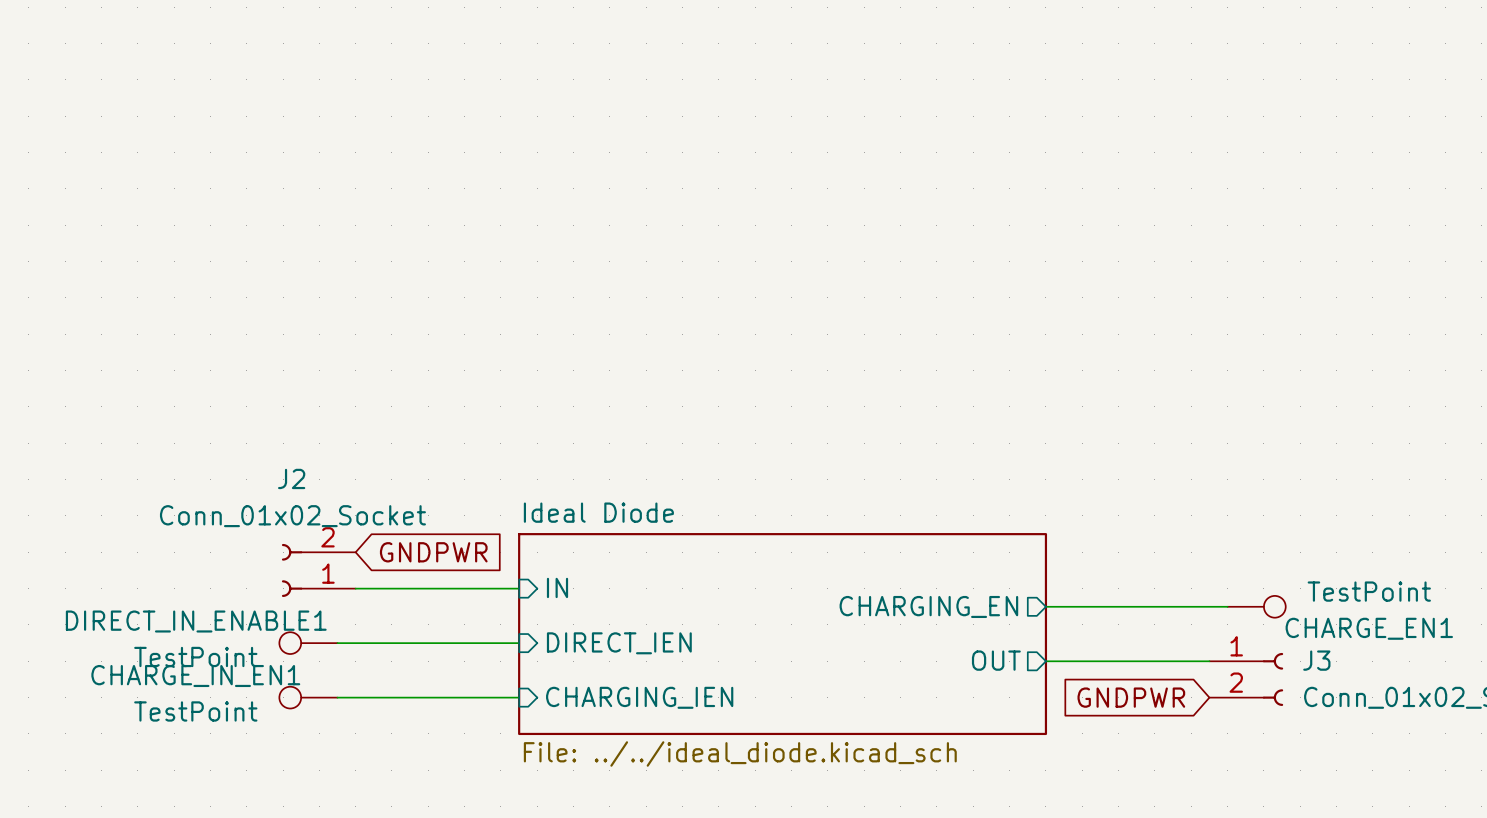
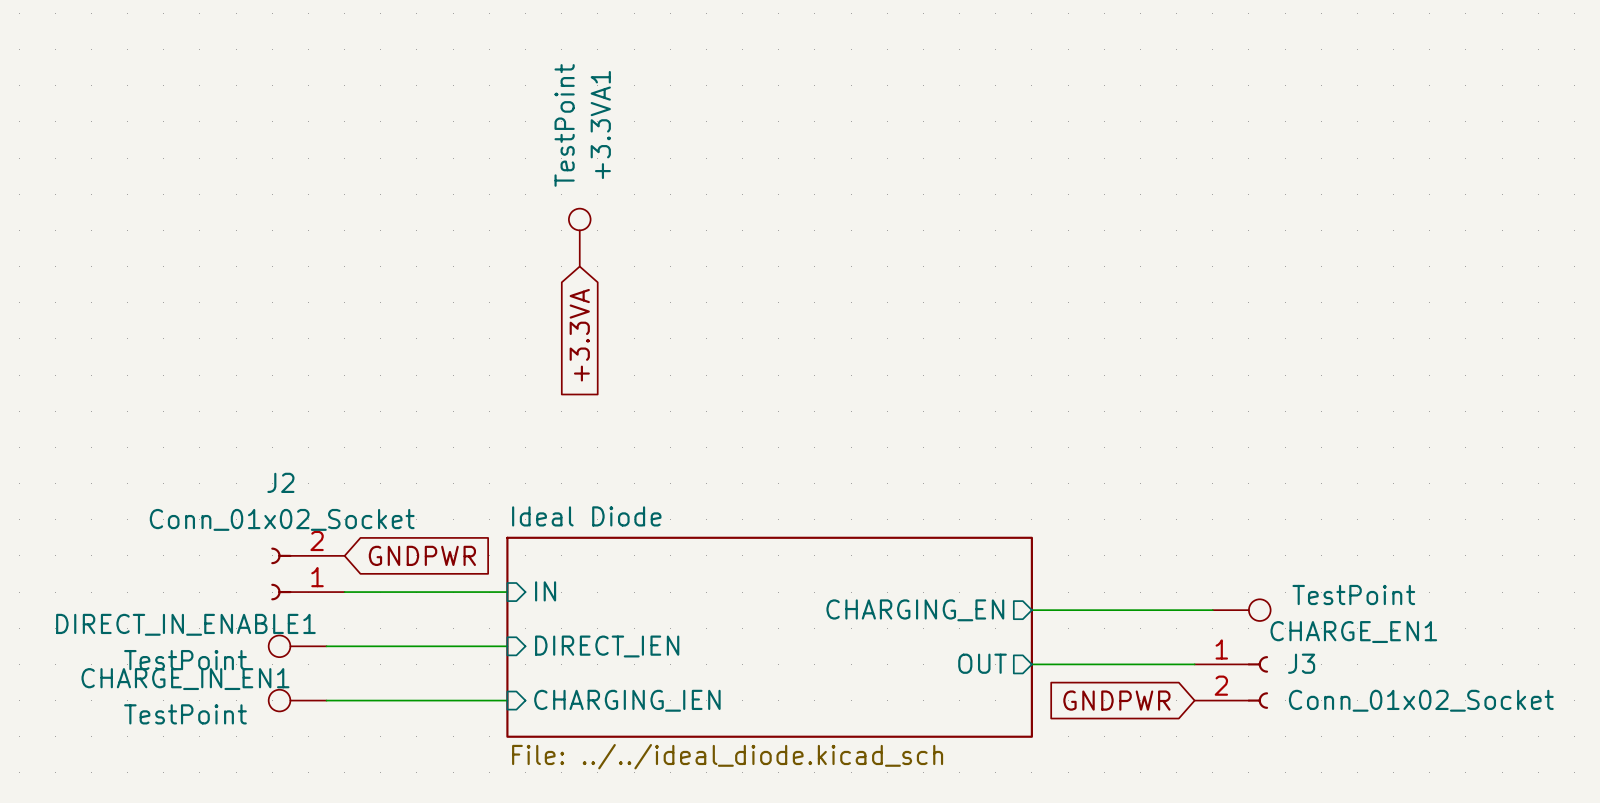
+3.3VA1: none -> TestPoint (579, 237)
global label: none -> +3.3VA (579, 335)

